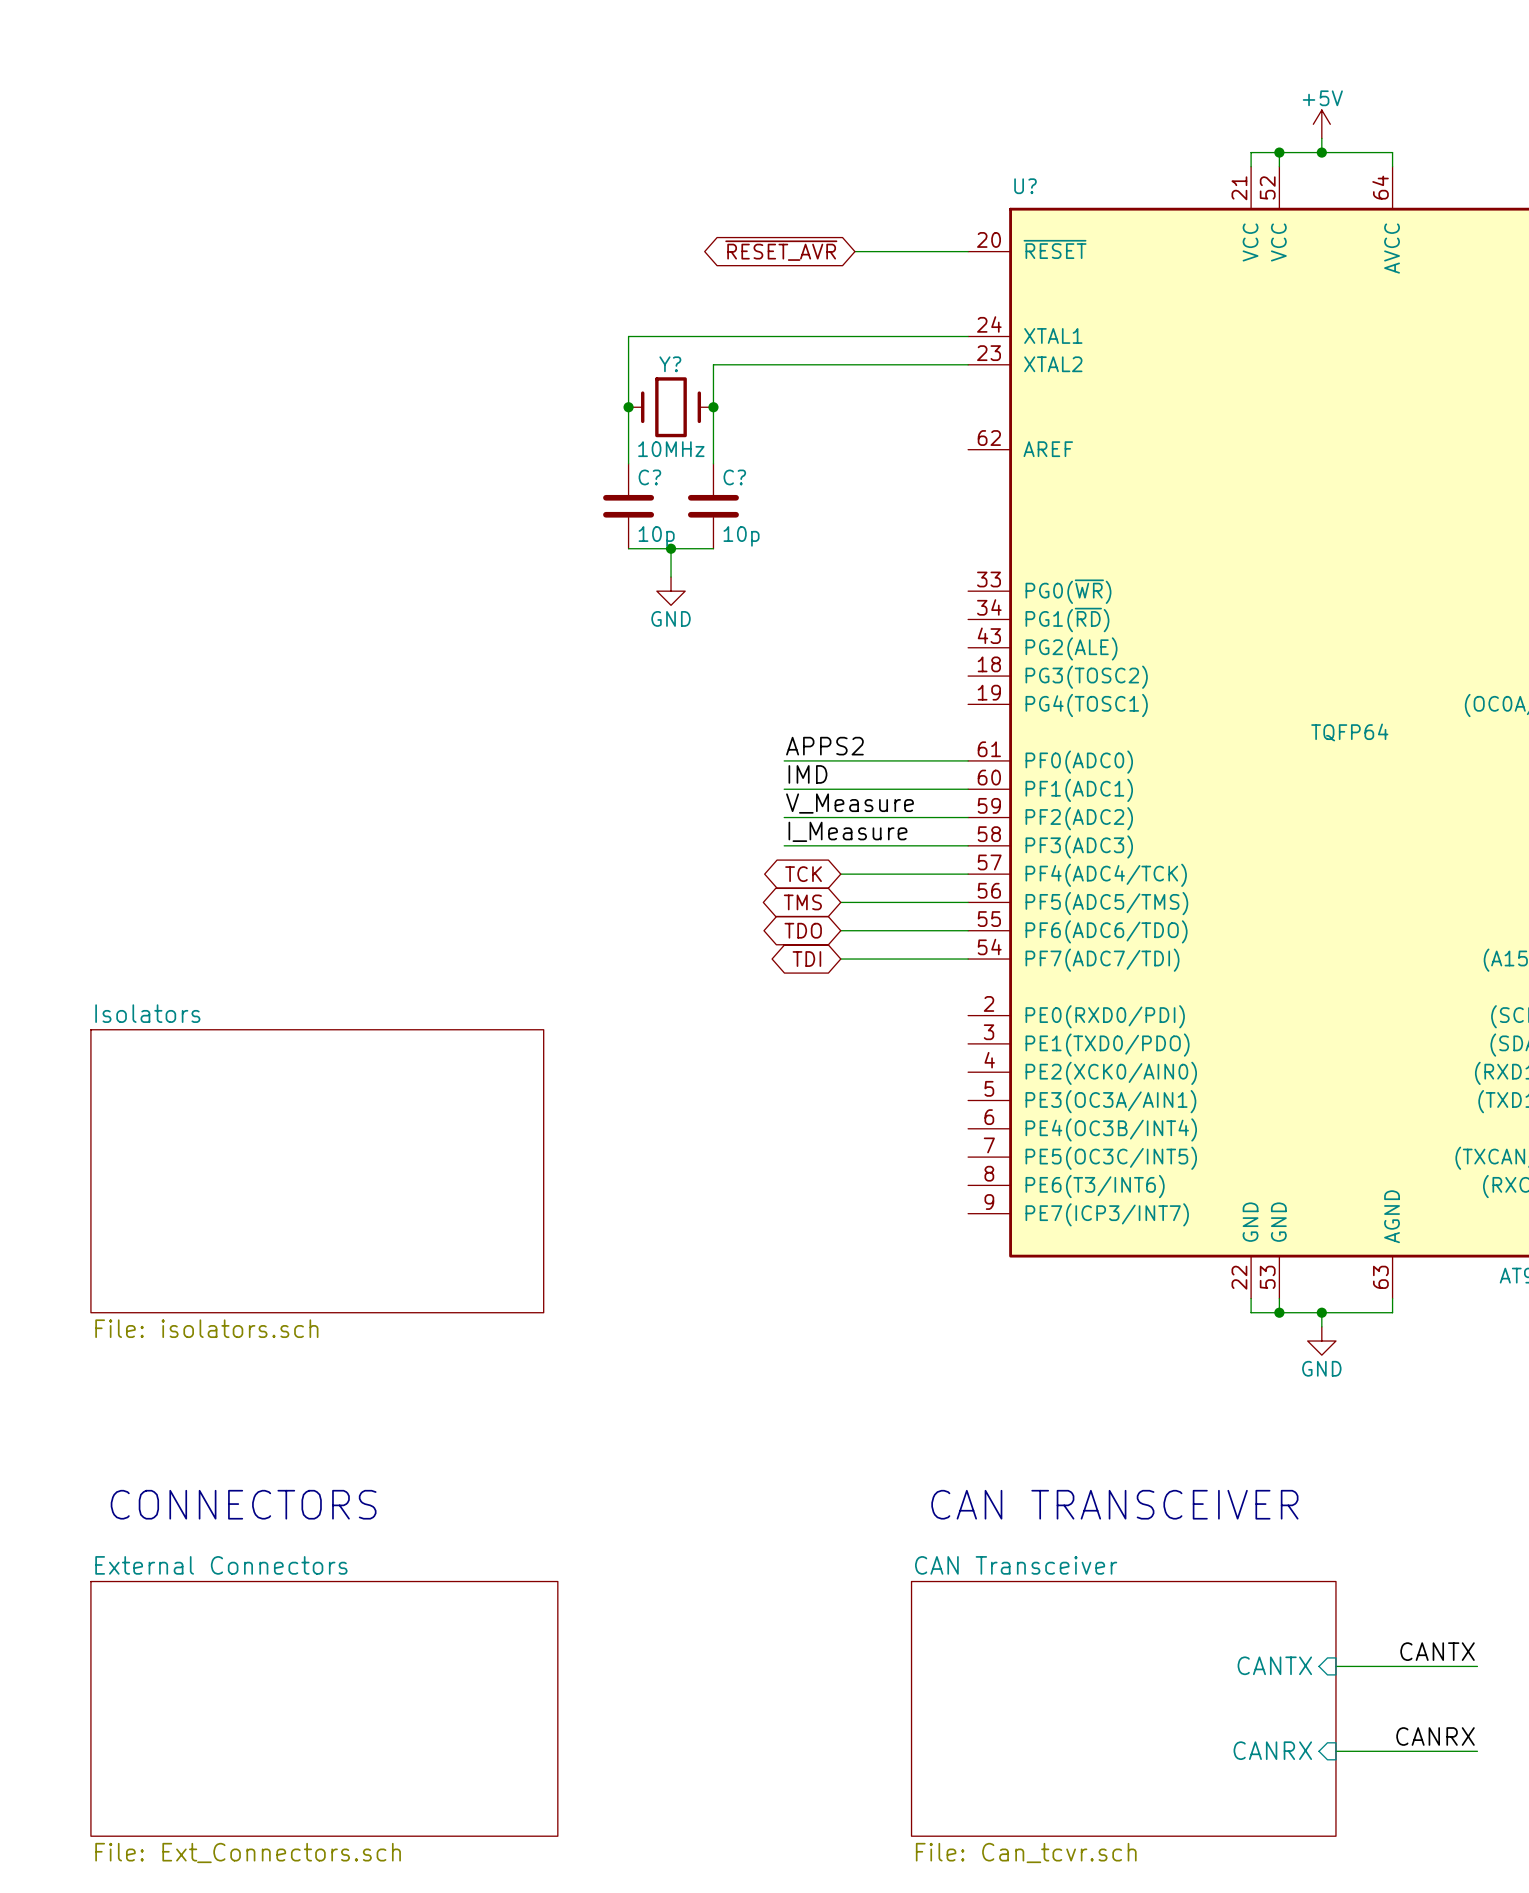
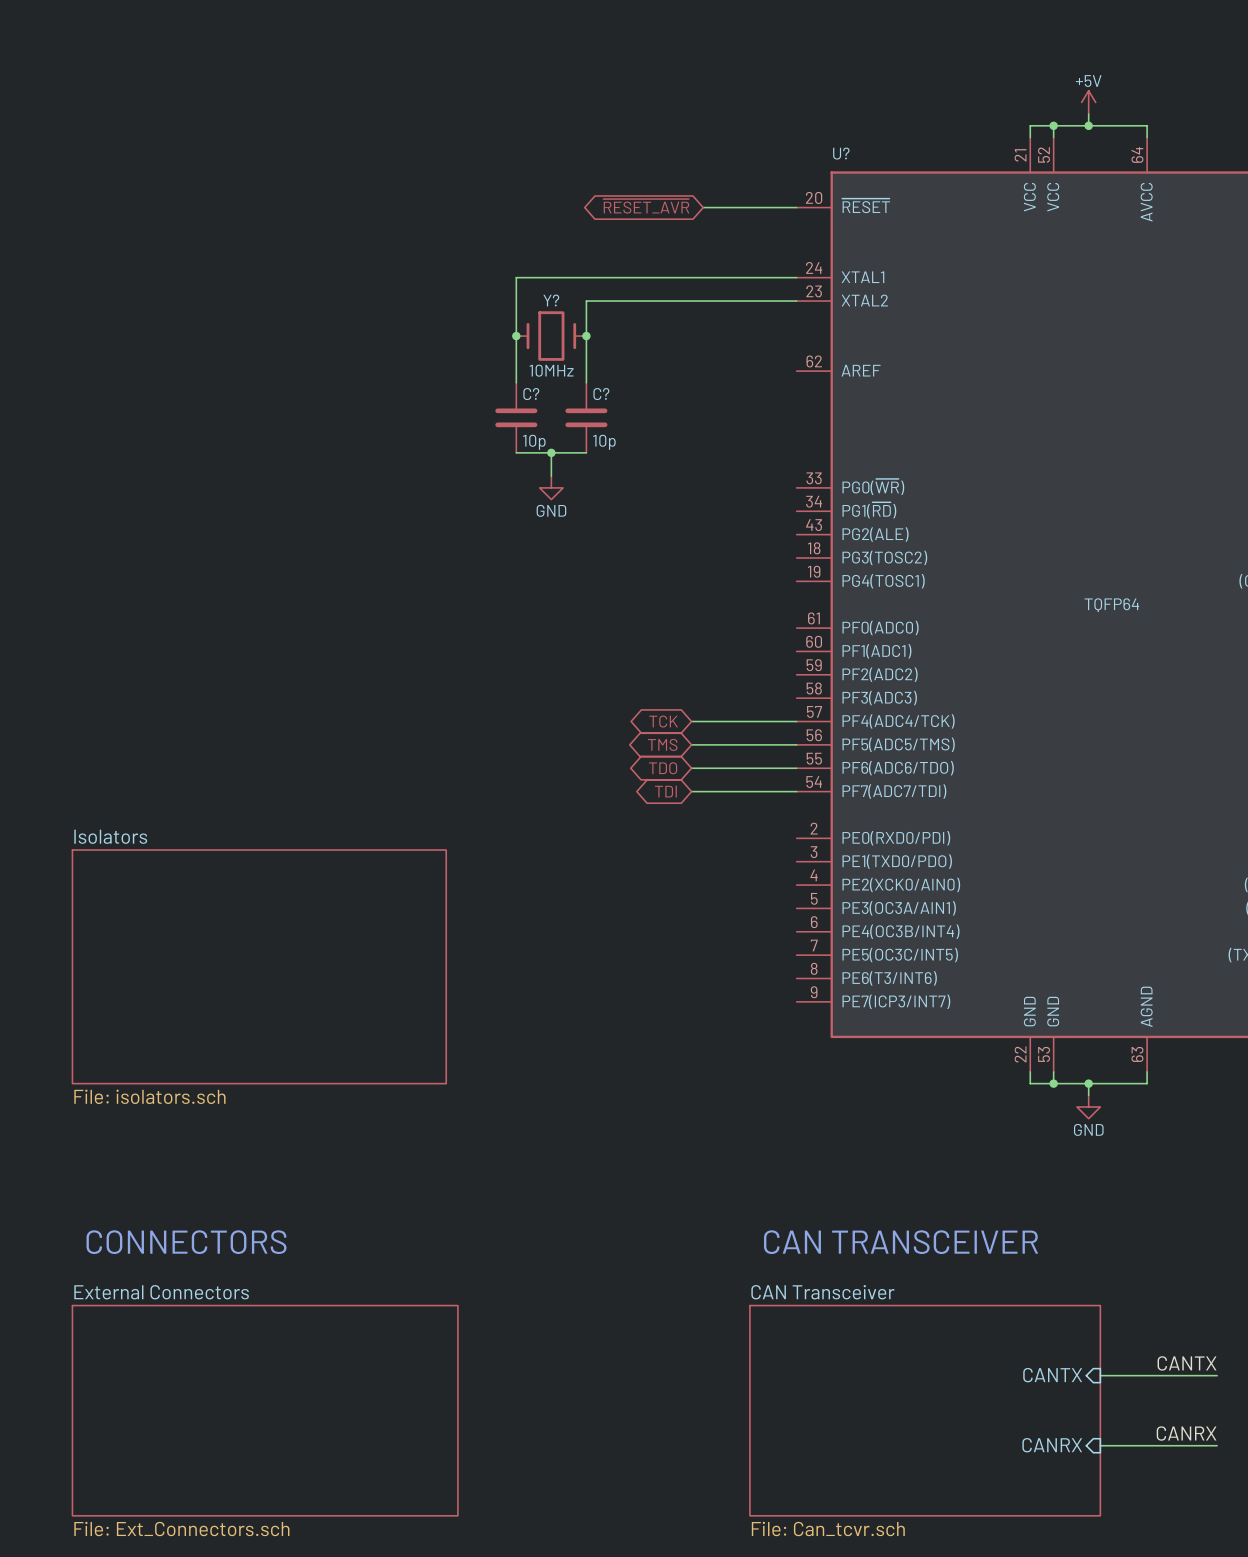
label: APPS2 (824, 746) -> none
wire: (784, 760) (968, 760) -> none
label: IMD (807, 774) -> none
wire: (784, 789) (968, 789) -> none
label: V_Measure (849, 803) -> none
wire: (784, 817) (968, 817) -> none
label: I_Measure (847, 831) -> none
wire: (784, 845) (968, 845) -> none

